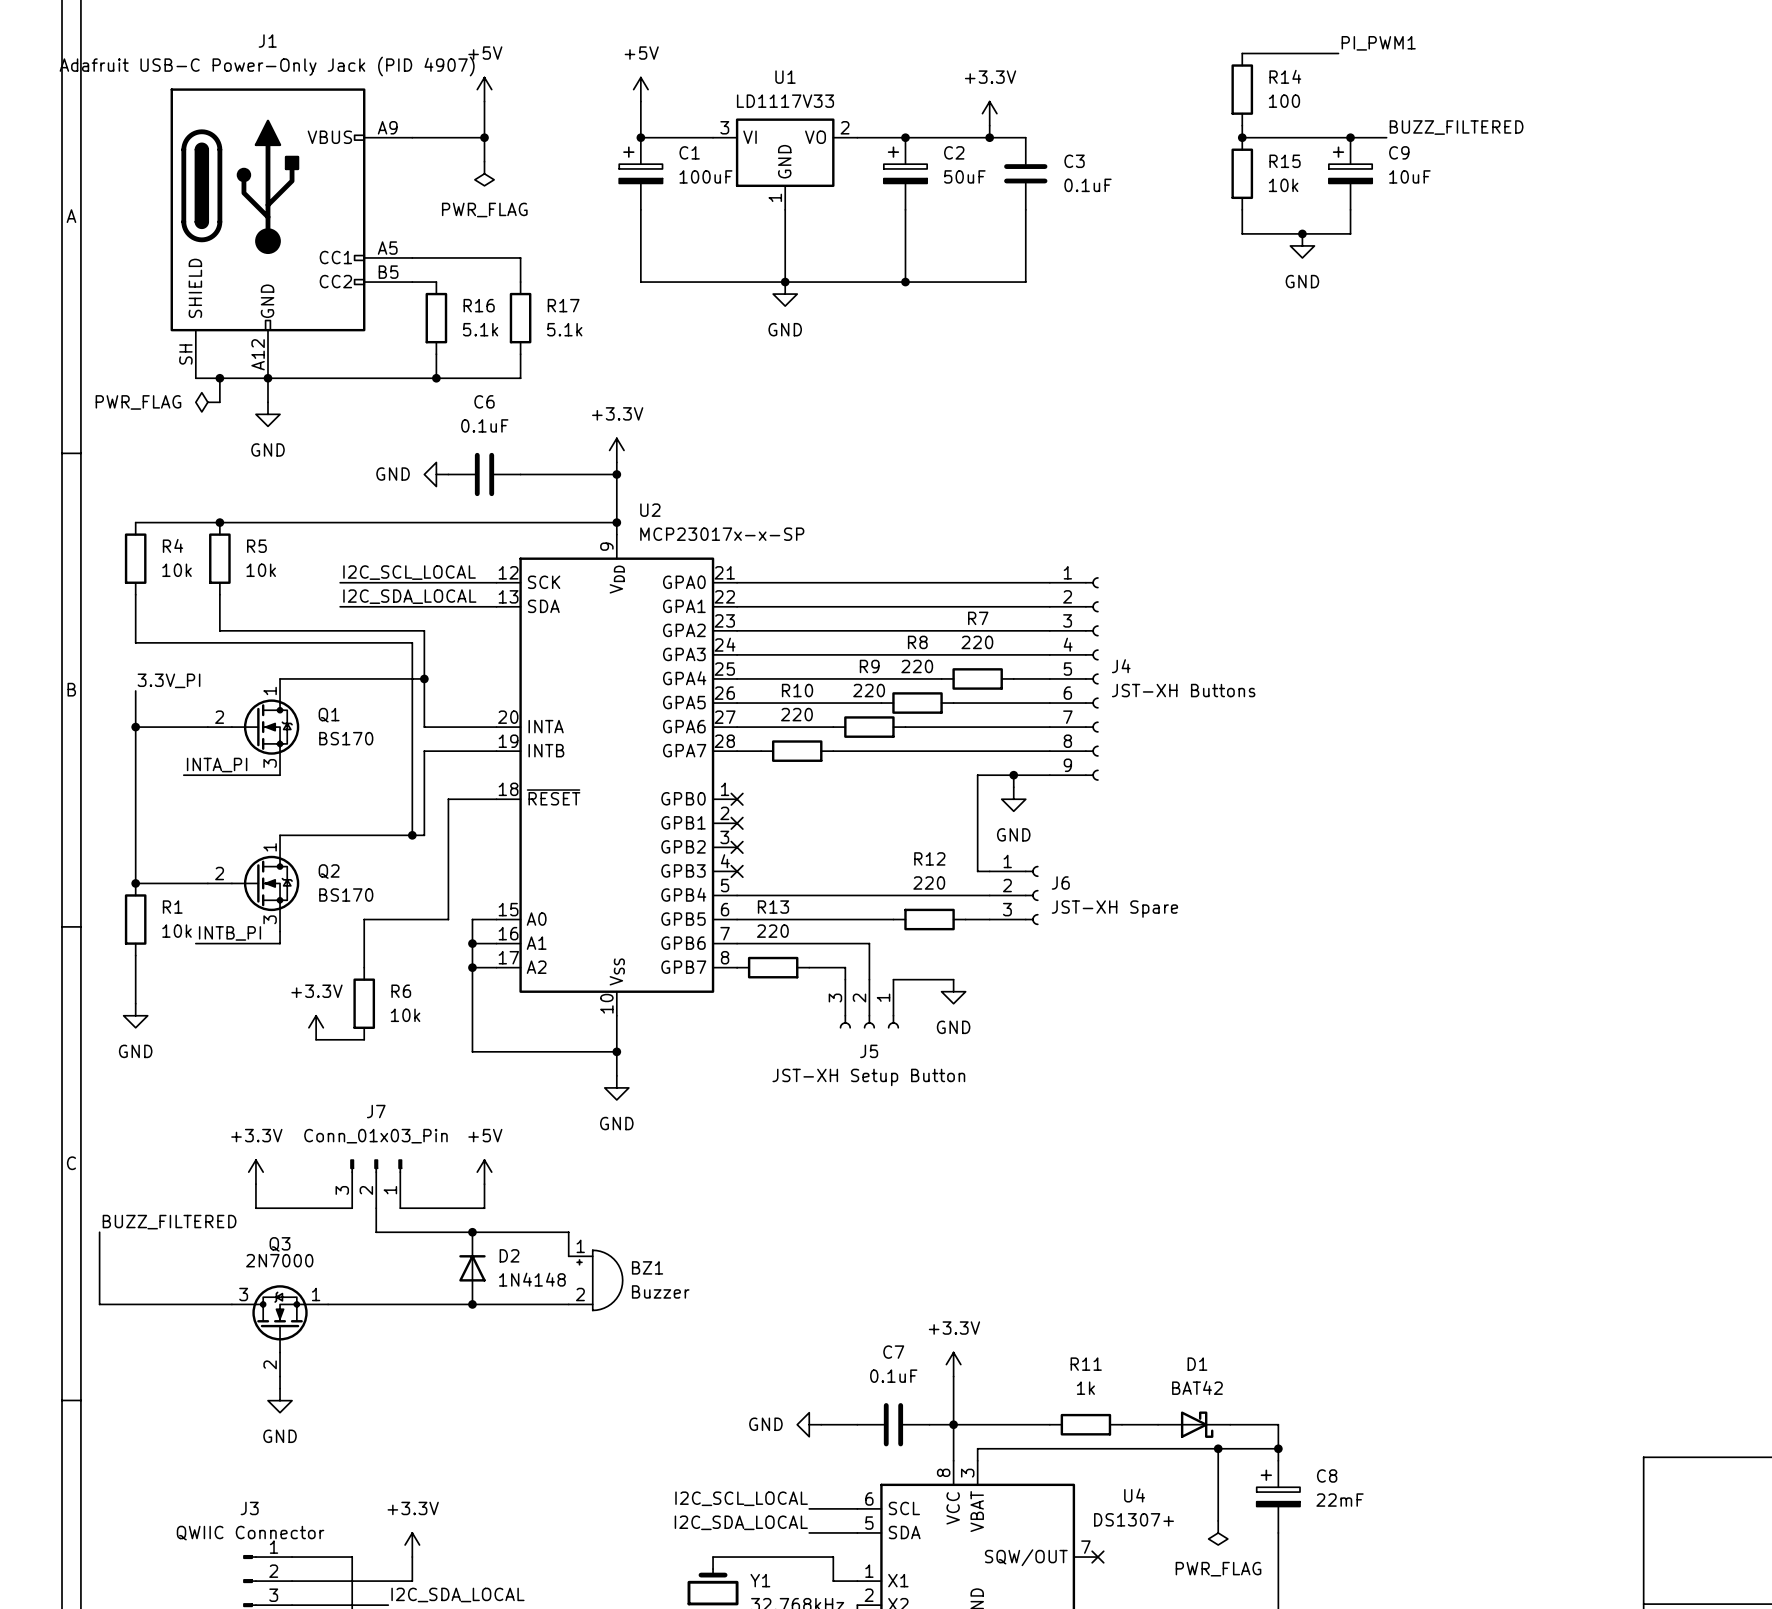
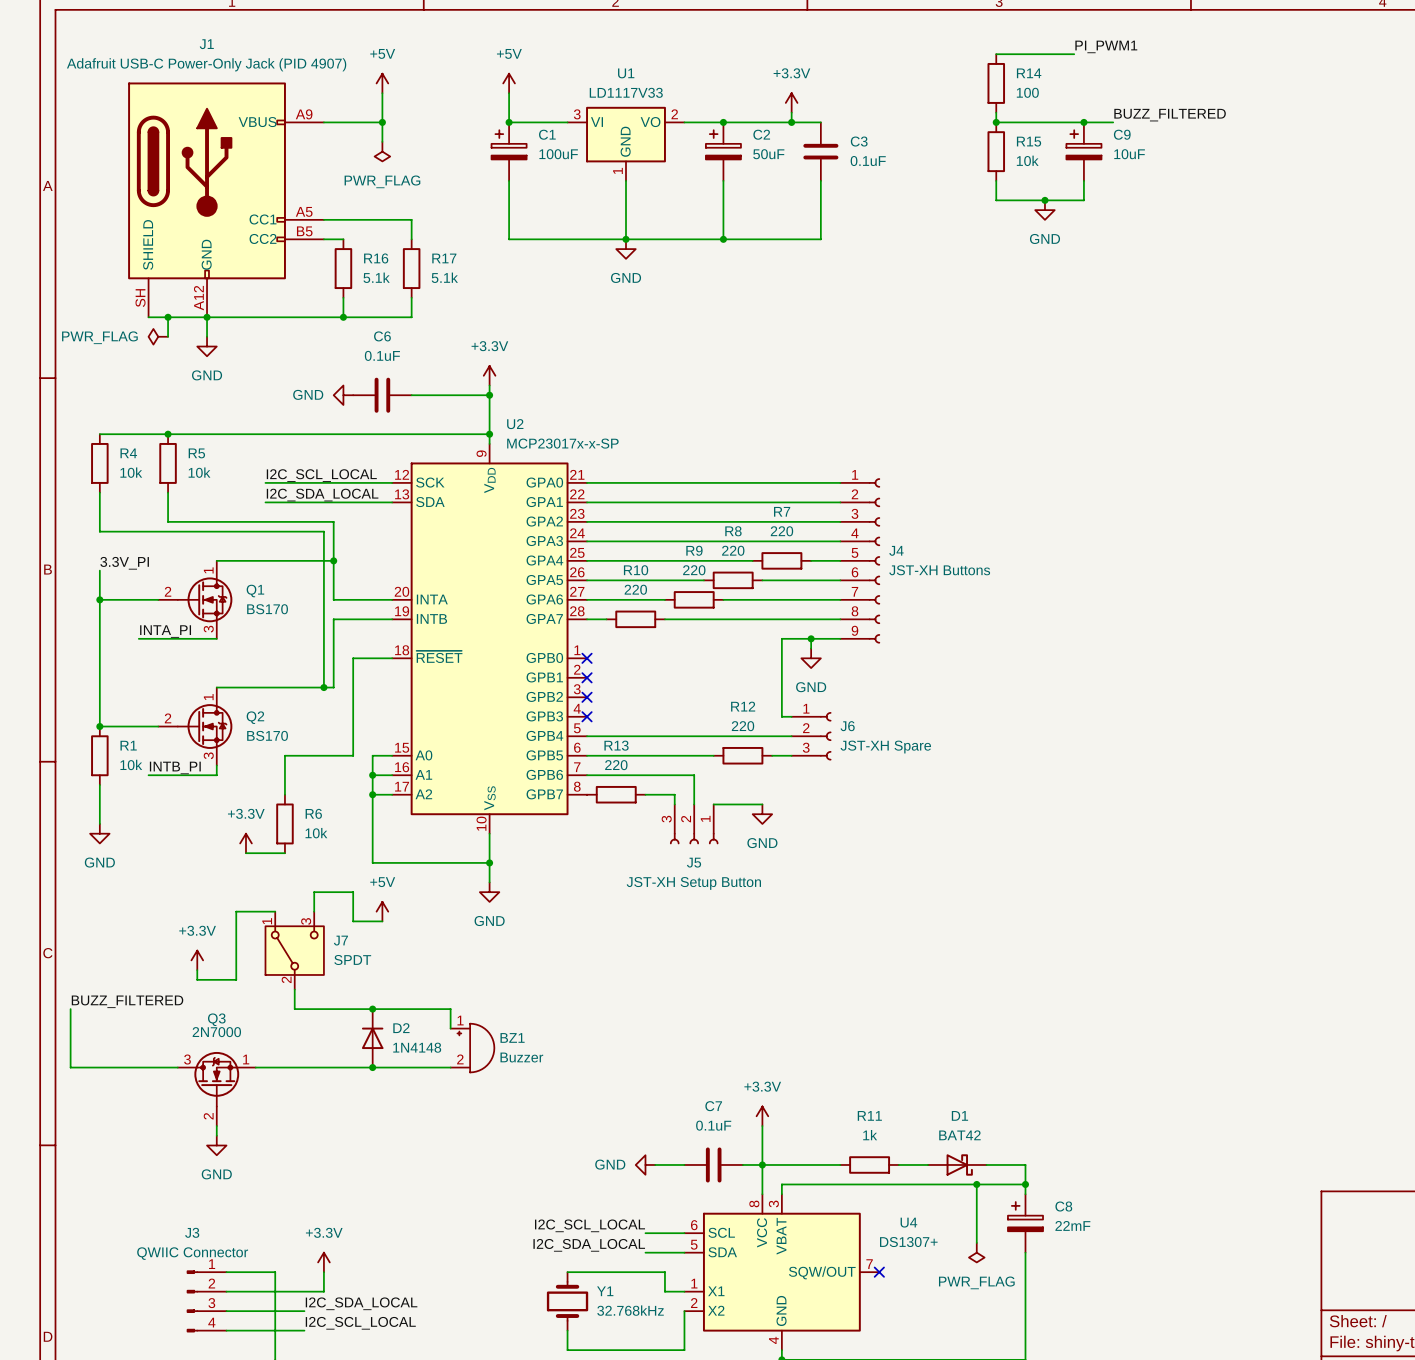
J7 name position: J7 (376, 1111) -> J7 (340, 940)
wire: none -> (314, 911) (314, 892) (353, 892) (353, 921) (382, 921)
J7 value: Conn_01x03_Pin (375, 1136) -> SPDT (352, 960)
J7 symbol: [350, 1159, 403, 1209] -> [265, 911, 324, 990]
power symbol position: +5V (484, 1172) -> +5V (382, 911)
wire: (484, 1184) (484, 1208) (400, 1208) -> none
wire: (255, 1196) (255, 1208) (352, 1208) -> (197, 979) (236, 979) (236, 911) (275, 911)

